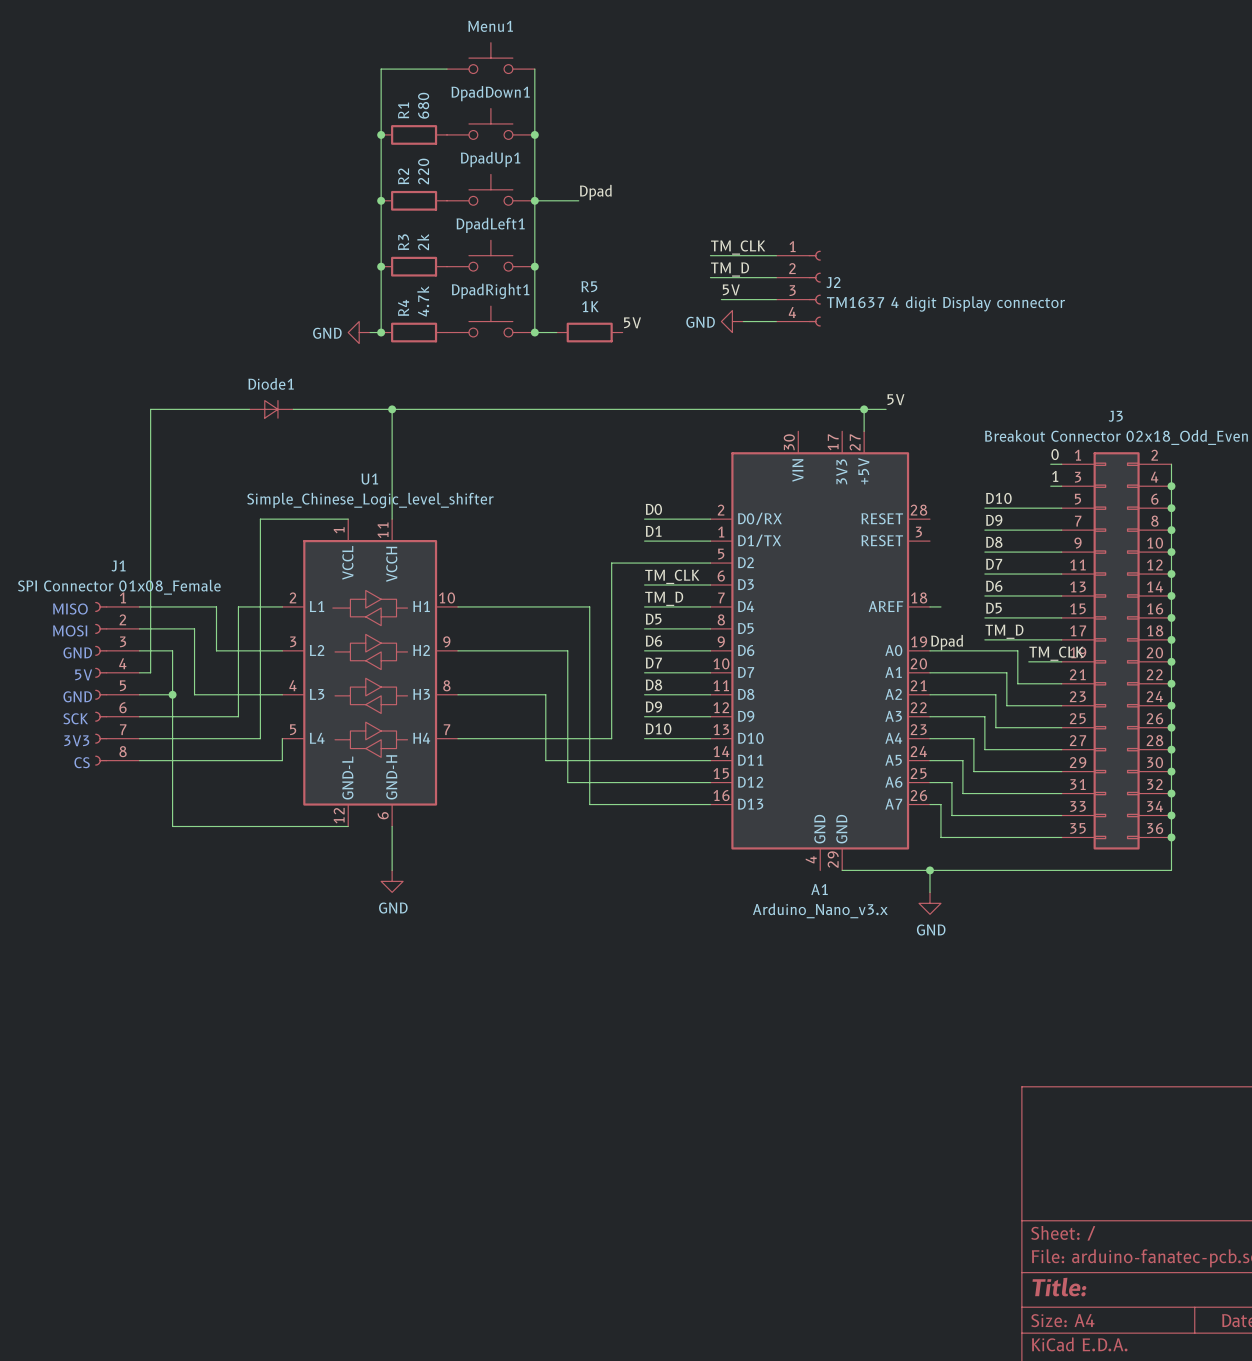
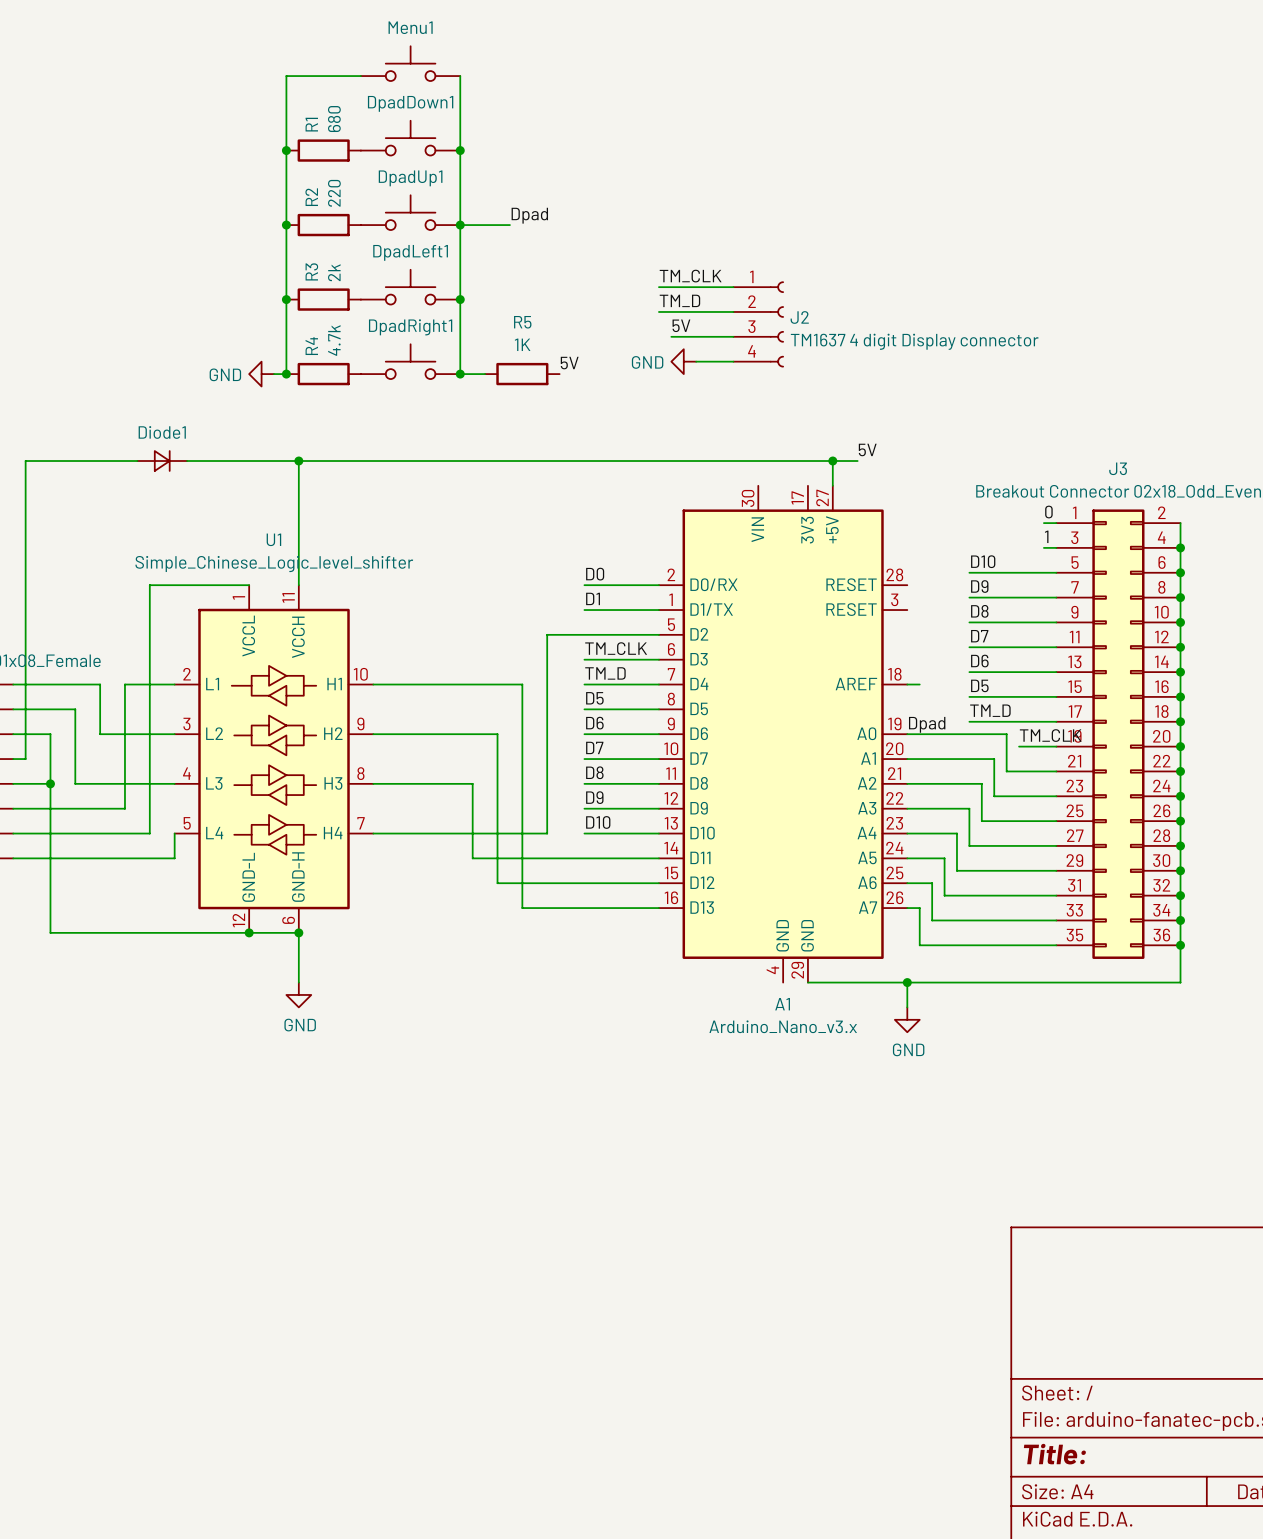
wire: none -> (249, 932) (298, 932)
junction: none -> (249, 932)
junction: none -> (298, 932)

